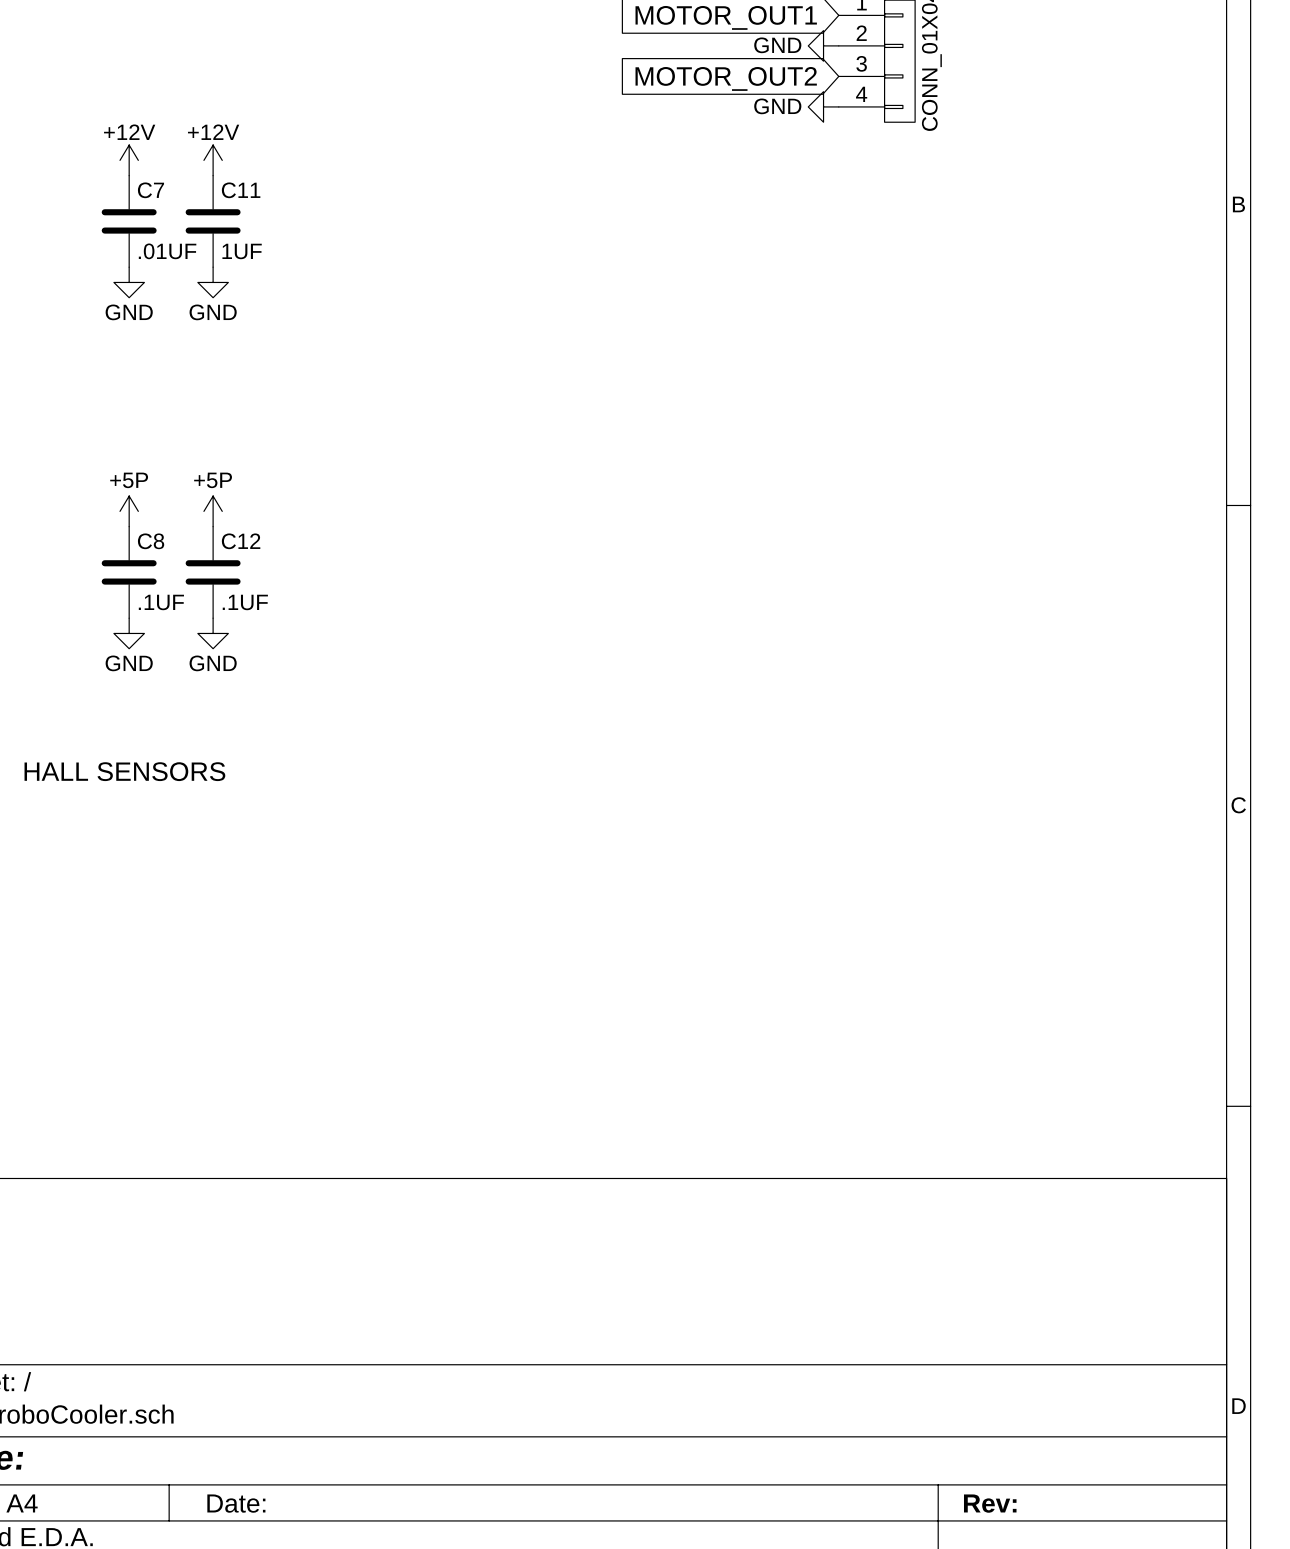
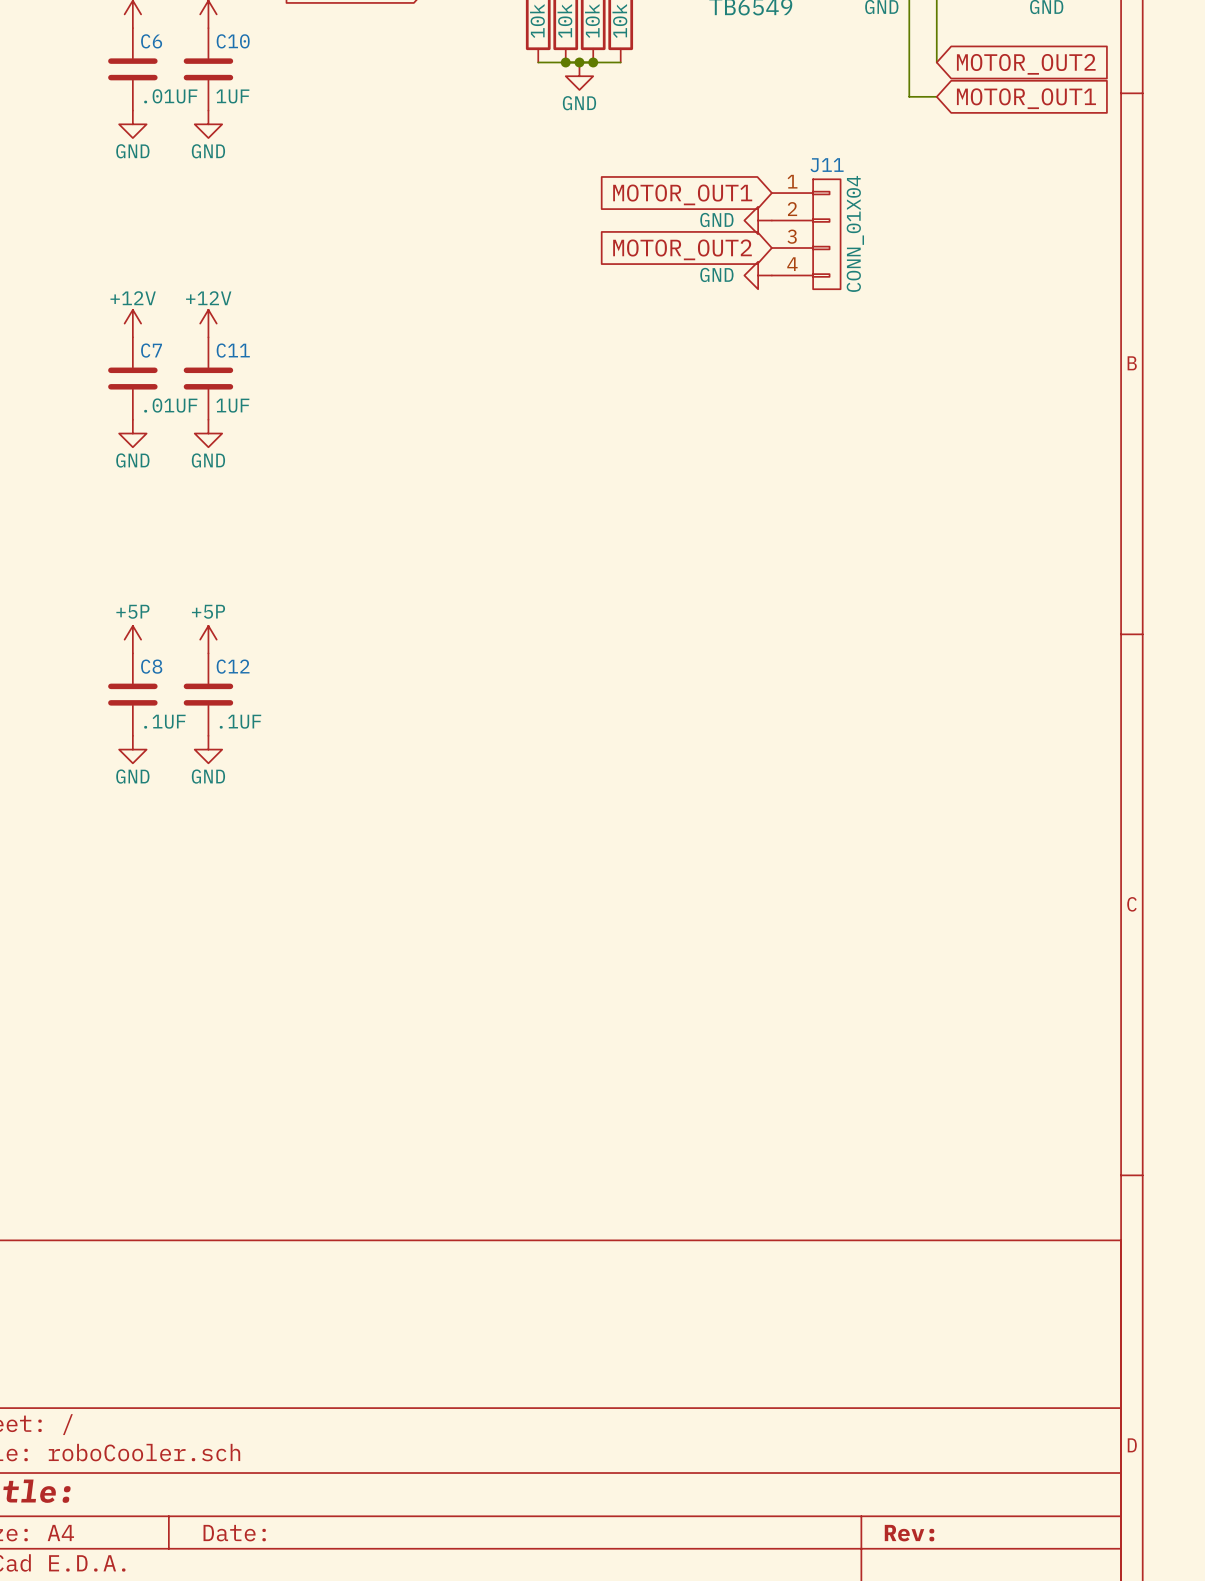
text: HALL SENSORS (124, 771) -> none

